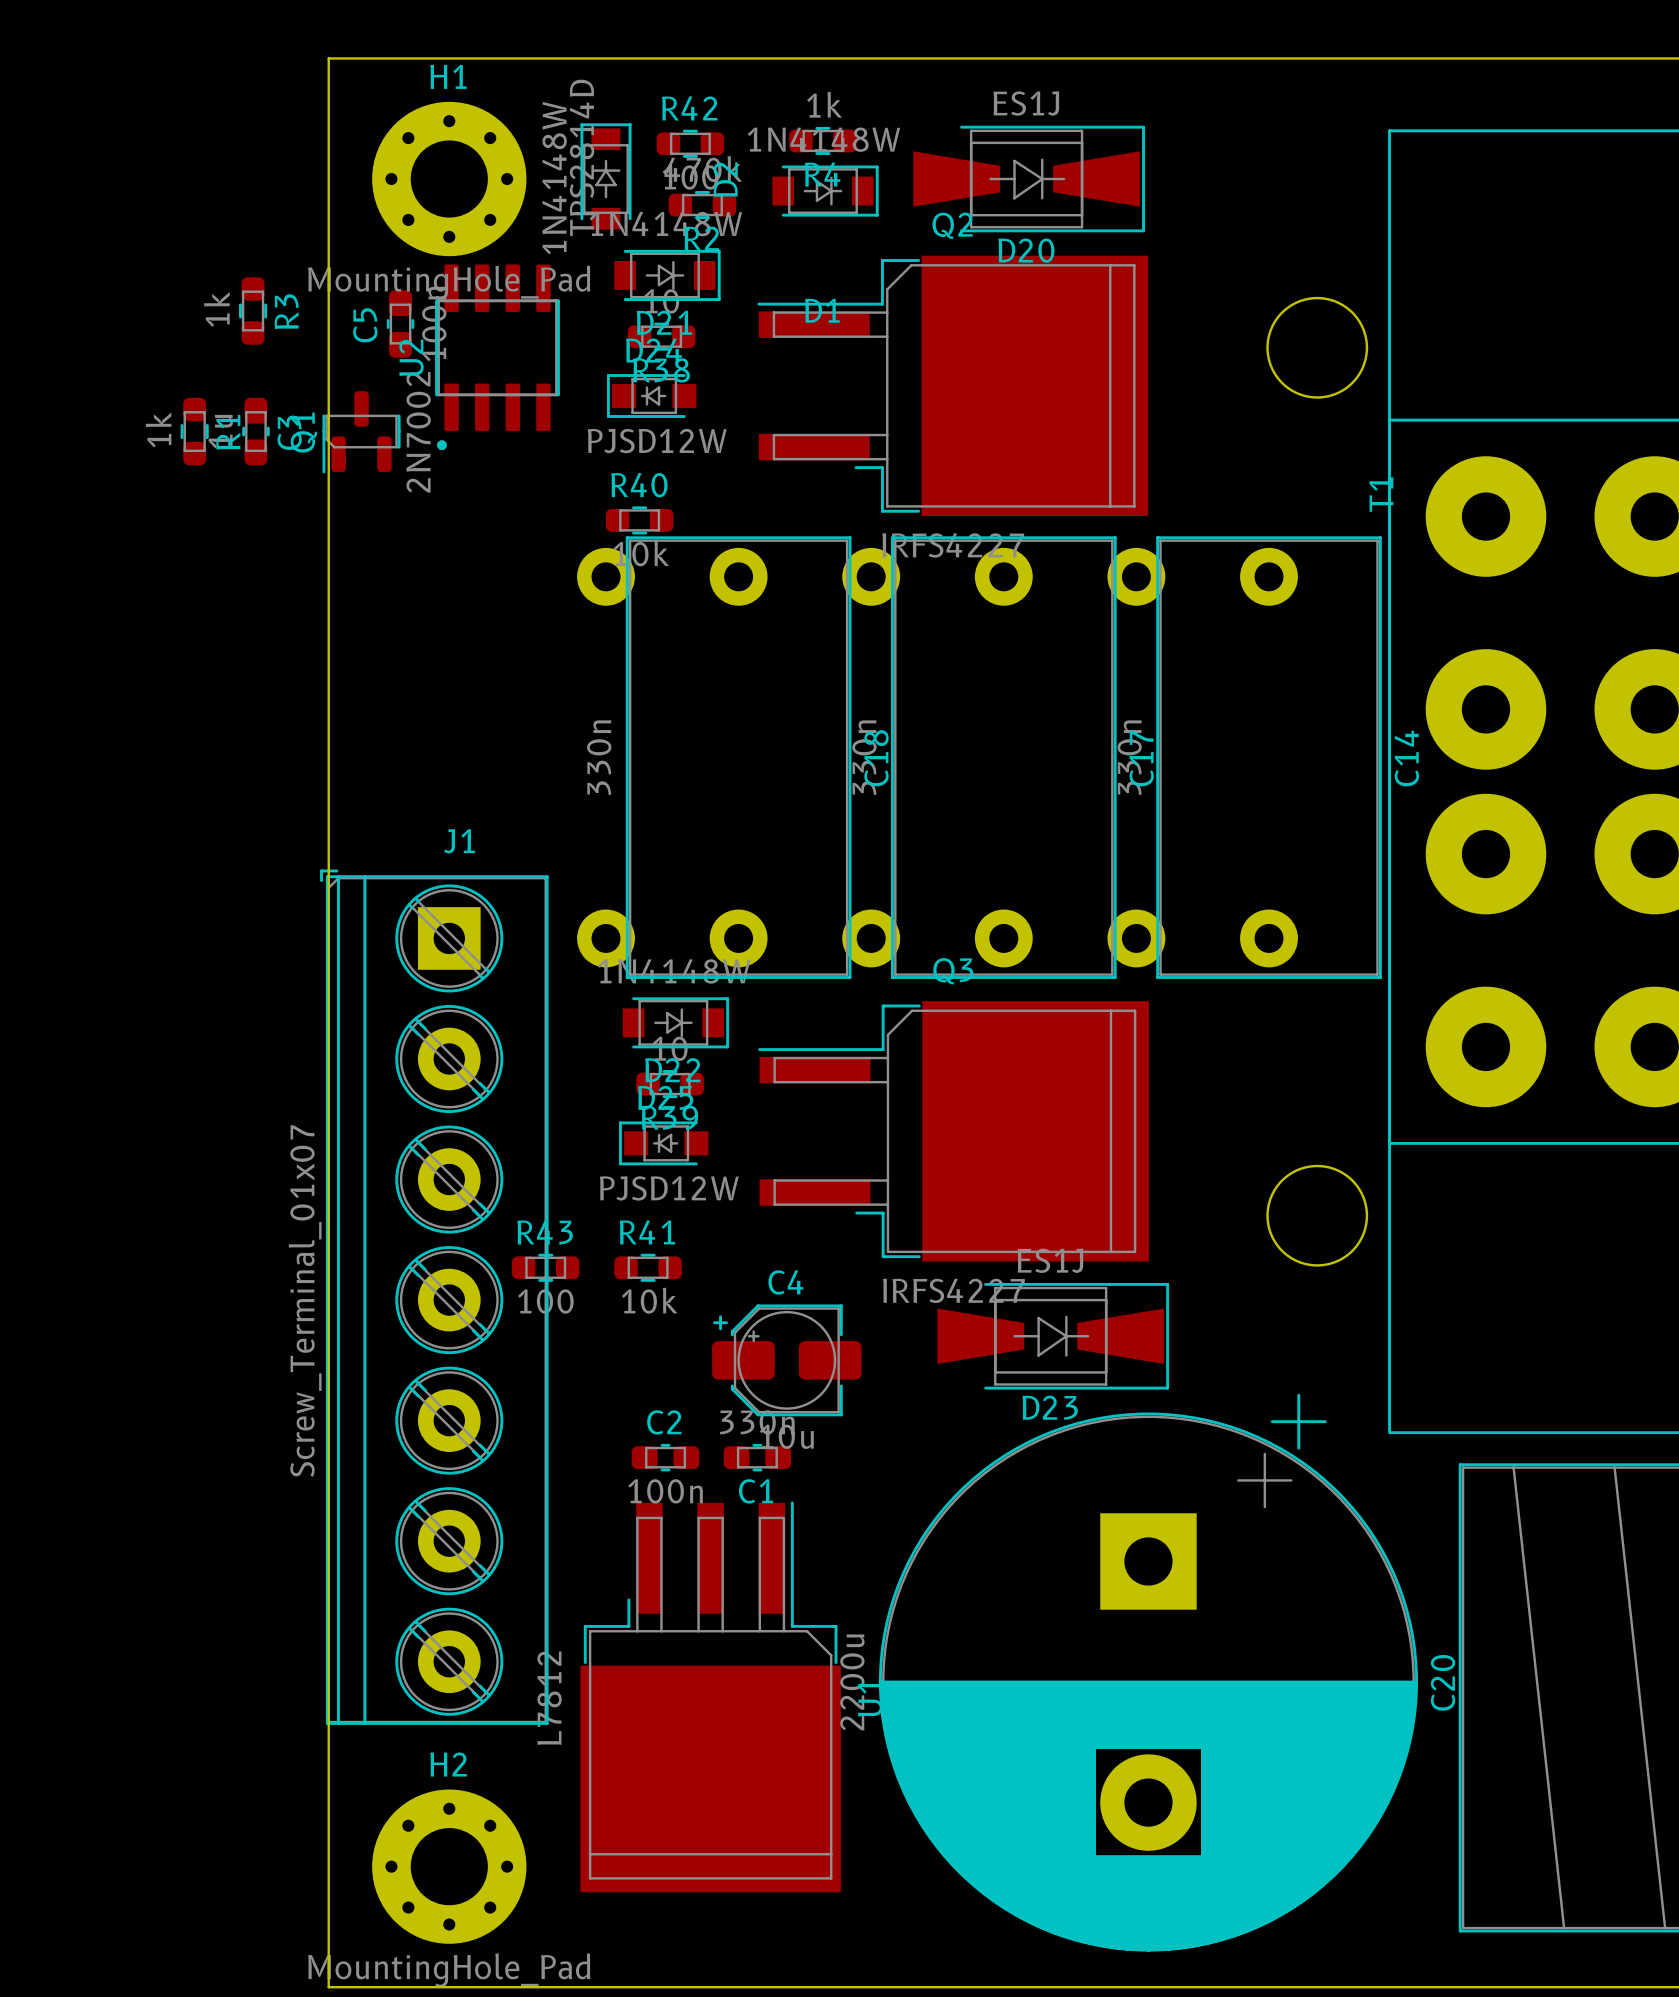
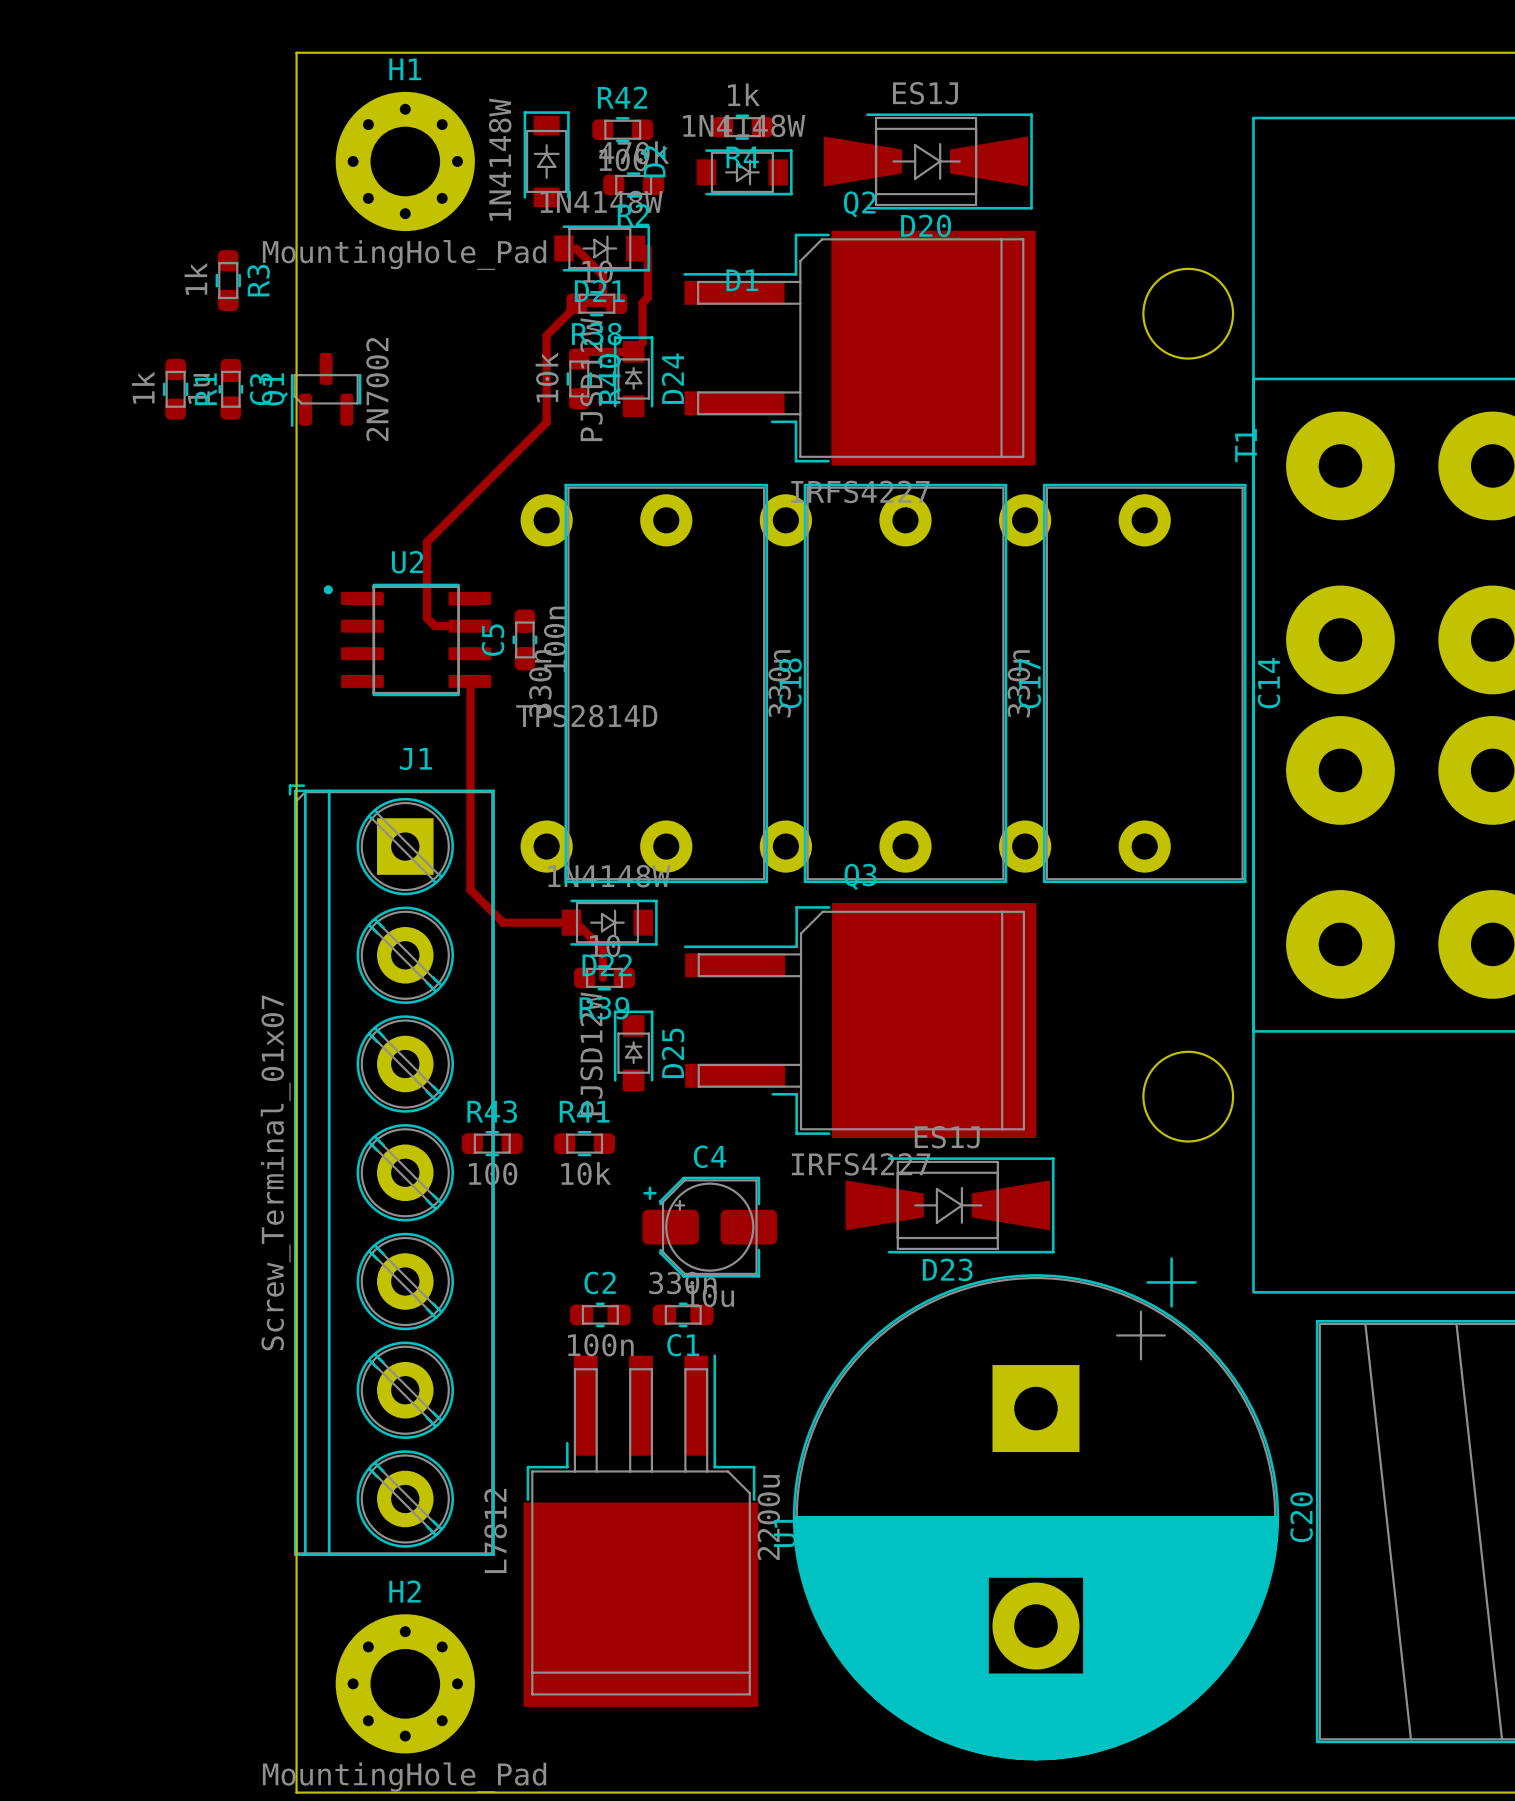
track: none -> (576, 248) (602, 275) (602, 302) (579, 302) (546, 335) (546, 422) (427, 542) (427, 618) (434, 626) (469, 626)
track: none -> (647, 248) (647, 297) (642, 302) (642, 342) (633, 351) (586, 351) (579, 359)
C5 position: (400, 324) -> (524, 639)
U2 rotation: 0° (497, 357) -> 90° clockwise (407, 639)
U2 position: (497, 357) -> (407, 639)
D24 rotation: 0° (651, 396) -> 90° clockwise (633, 376)
D24 position: (651, 396) -> (633, 376)
R40 rotation: 0° (639, 520) -> 90° clockwise (579, 378)
R40 position: (639, 520) -> (579, 378)
track: none -> (469, 681) (470, 890) (503, 922) (576, 922) (602, 949) (602, 977)
D25 rotation: 0° (663, 1143) -> 90° clockwise (633, 1050)

